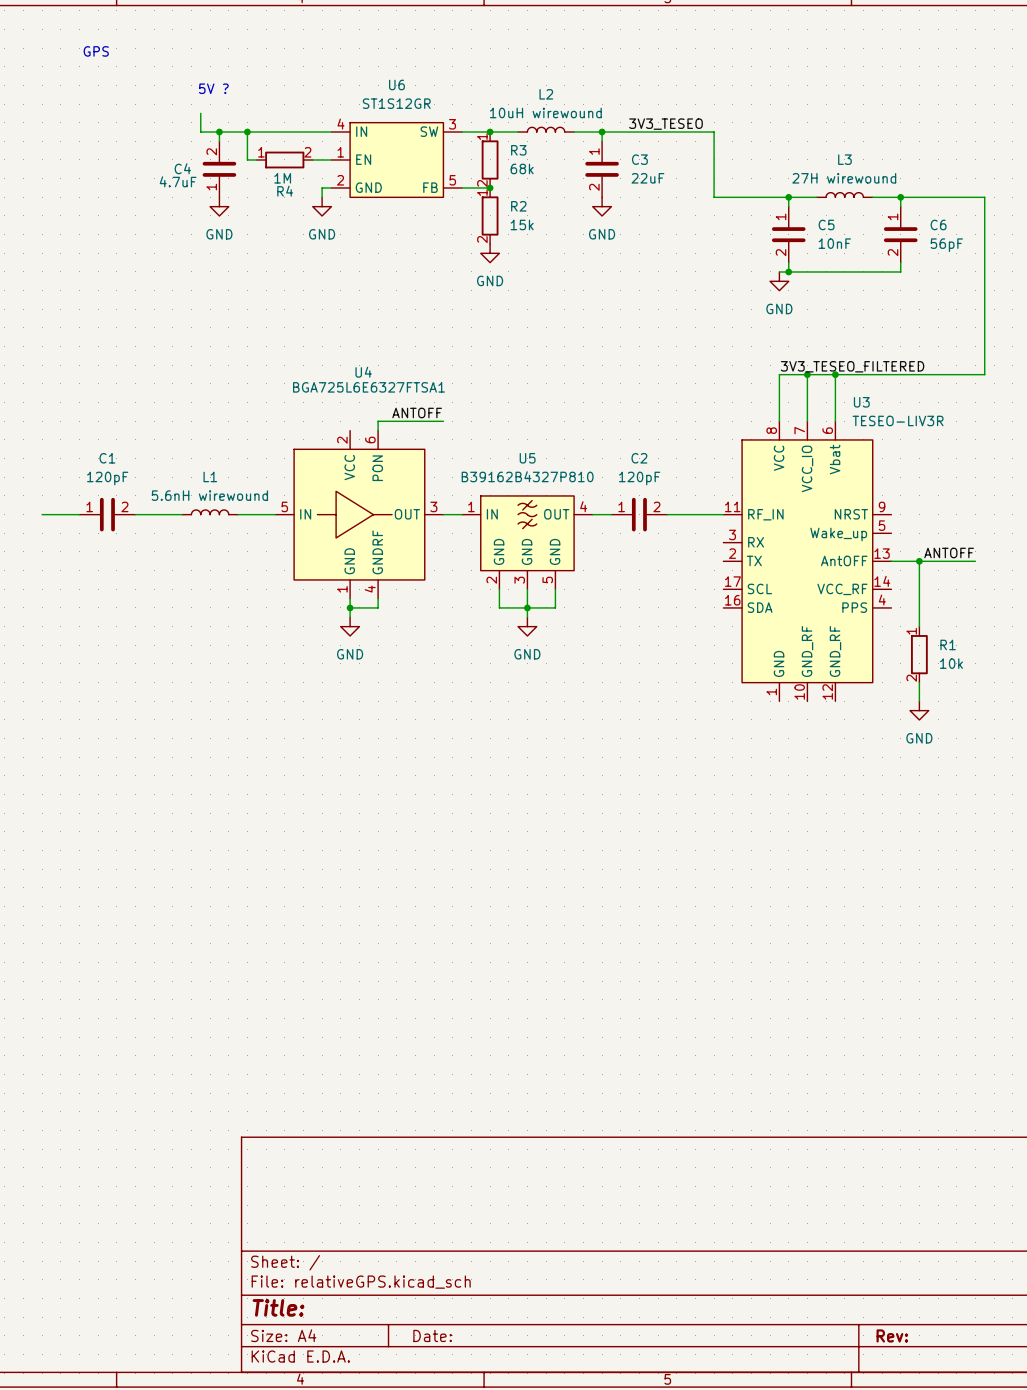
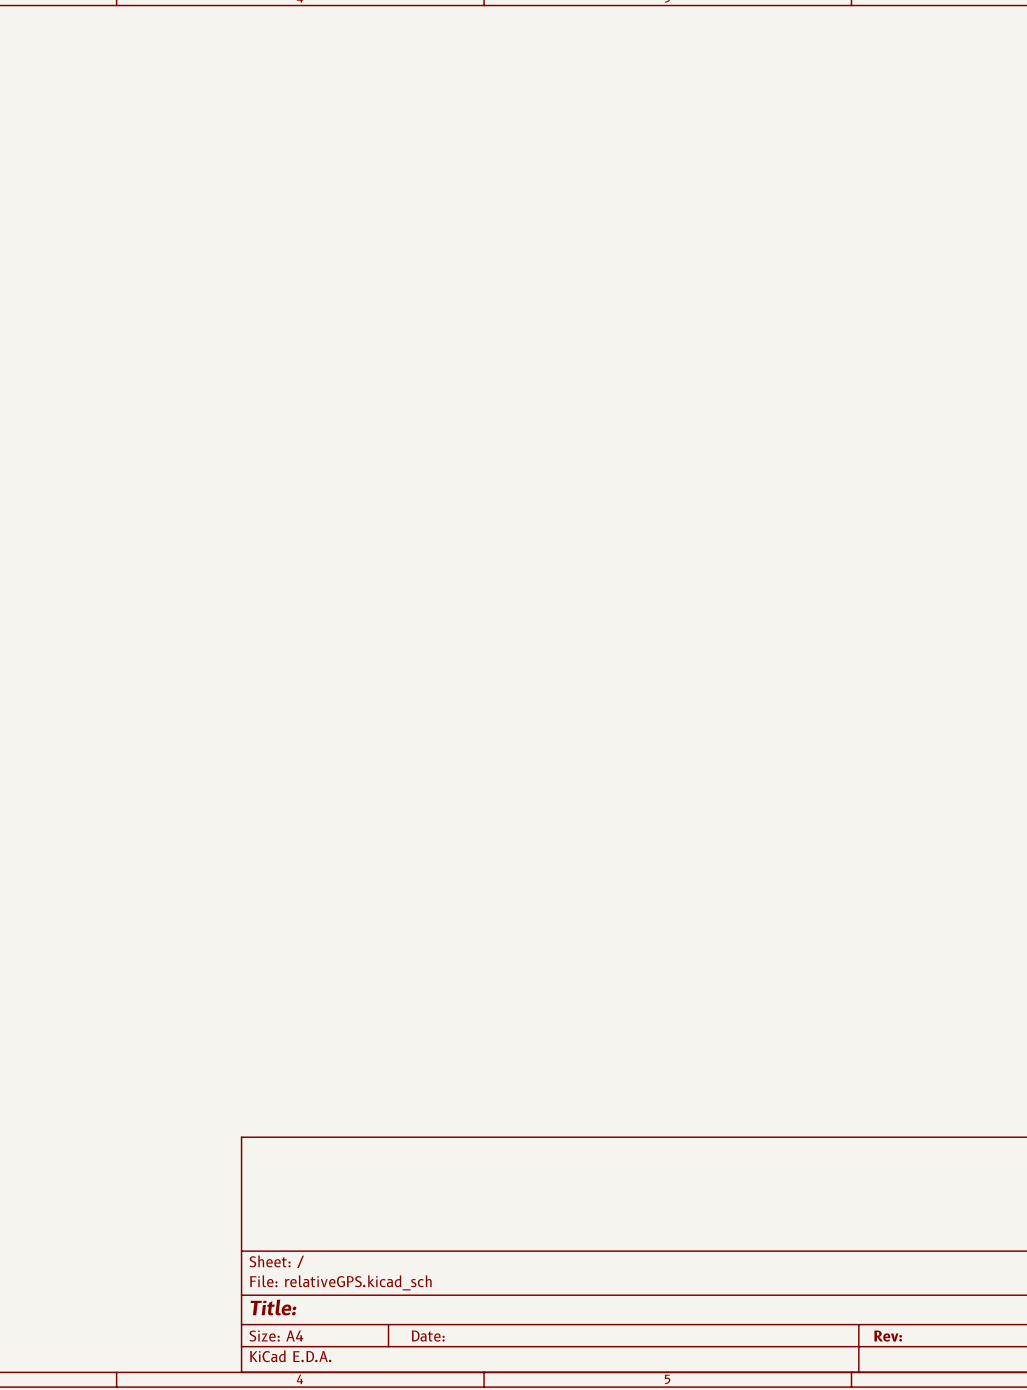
text: GPS (96, 51) -> none
text: 5V ? (213, 88) -> none
wire: (200, 113) (200, 131) (331, 131) -> none
label: 3V3_TESEO (666, 124) -> none
L2: (546, 129) -> none
wire: (219, 131) (219, 141) -> none
junction: (219, 131) -> none
wire: (247, 131) (247, 159) (256, 159) -> none
junction: (247, 131) -> none
wire: (462, 131) (518, 131) -> none
junction: (490, 131) -> none
wire: (574, 131) (714, 131) (714, 197) (816, 197) -> none
wire: (602, 131) (602, 141) -> none
junction: (602, 131) -> none
R4: (284, 159) -> none
wire: (312, 159) (331, 159) -> none
U6: (396, 159) -> none
R3: (490, 159) -> none
C4: (219, 169) -> none
C3: (602, 169) -> none
wire: (331, 187) (322, 187) (322, 197) -> none
wire: (462, 187) (490, 187) -> none
junction: (490, 187) -> none
L3: (844, 194) -> none
wire: (788, 197) (788, 206) -> none
junction: (788, 197) -> none
wire: (872, 197) (984, 197) (984, 374) (779, 374) (779, 421) -> none
wire: (900, 197) (900, 206) -> none
junction: (900, 197) -> none
power symbol: GND (219, 206) -> none
power symbol: GND (322, 206) -> none
power symbol: GND (602, 206) -> none
R2: (490, 215) -> none
C5: (788, 234) -> none
C6: (900, 234) -> none
power symbol: GND (490, 253) -> none
wire: (788, 262) (788, 271) -> none
wire: (900, 262) (900, 271) (779, 271) -> none
junction: (788, 271) -> none
power symbol: GND (779, 281) -> none
label: 3V3_TESEO_FILTERED (852, 366) -> none
wire: (807, 374) (807, 421) -> none
junction: (807, 374) -> none
wire: (835, 374) (835, 421) -> none
junction: (835, 374) -> none
label: ANTOFF (417, 412) -> none
wire: (443, 421) (378, 421) (378, 430) -> none
L1: (210, 512) -> none
wire: (42, 514) (79, 514) -> none
C1: (107, 514) -> none
wire: (135, 514) (182, 514) -> none
wire: (238, 514) (275, 514) -> none
U4: (359, 514) -> none
wire: (443, 514) (462, 514) -> none
wire: (592, 514) (611, 514) -> none
C2: (639, 514) -> none
wire: (667, 514) (723, 514) -> none
U5: (527, 542) -> none
label: ANTOFF (949, 552) -> none
U3: (807, 561) -> none
wire: (891, 561) (975, 561) -> none
wire: (919, 561) (919, 626) -> none
junction: (919, 561) -> none
wire: (499, 589) (499, 607) (555, 607) (555, 589) -> none
wire: (527, 589) (527, 617) -> none
wire: (350, 598) (350, 617) -> none
wire: (378, 598) (378, 607) (350, 607) -> none
junction: (350, 607) -> none
junction: (527, 607) -> none
power symbol: GND (350, 626) -> none
power symbol: GND (527, 626) -> none
R1: (919, 654) -> none
wire: (919, 682) (919, 701) -> none
power symbol: GND (919, 710) -> none

